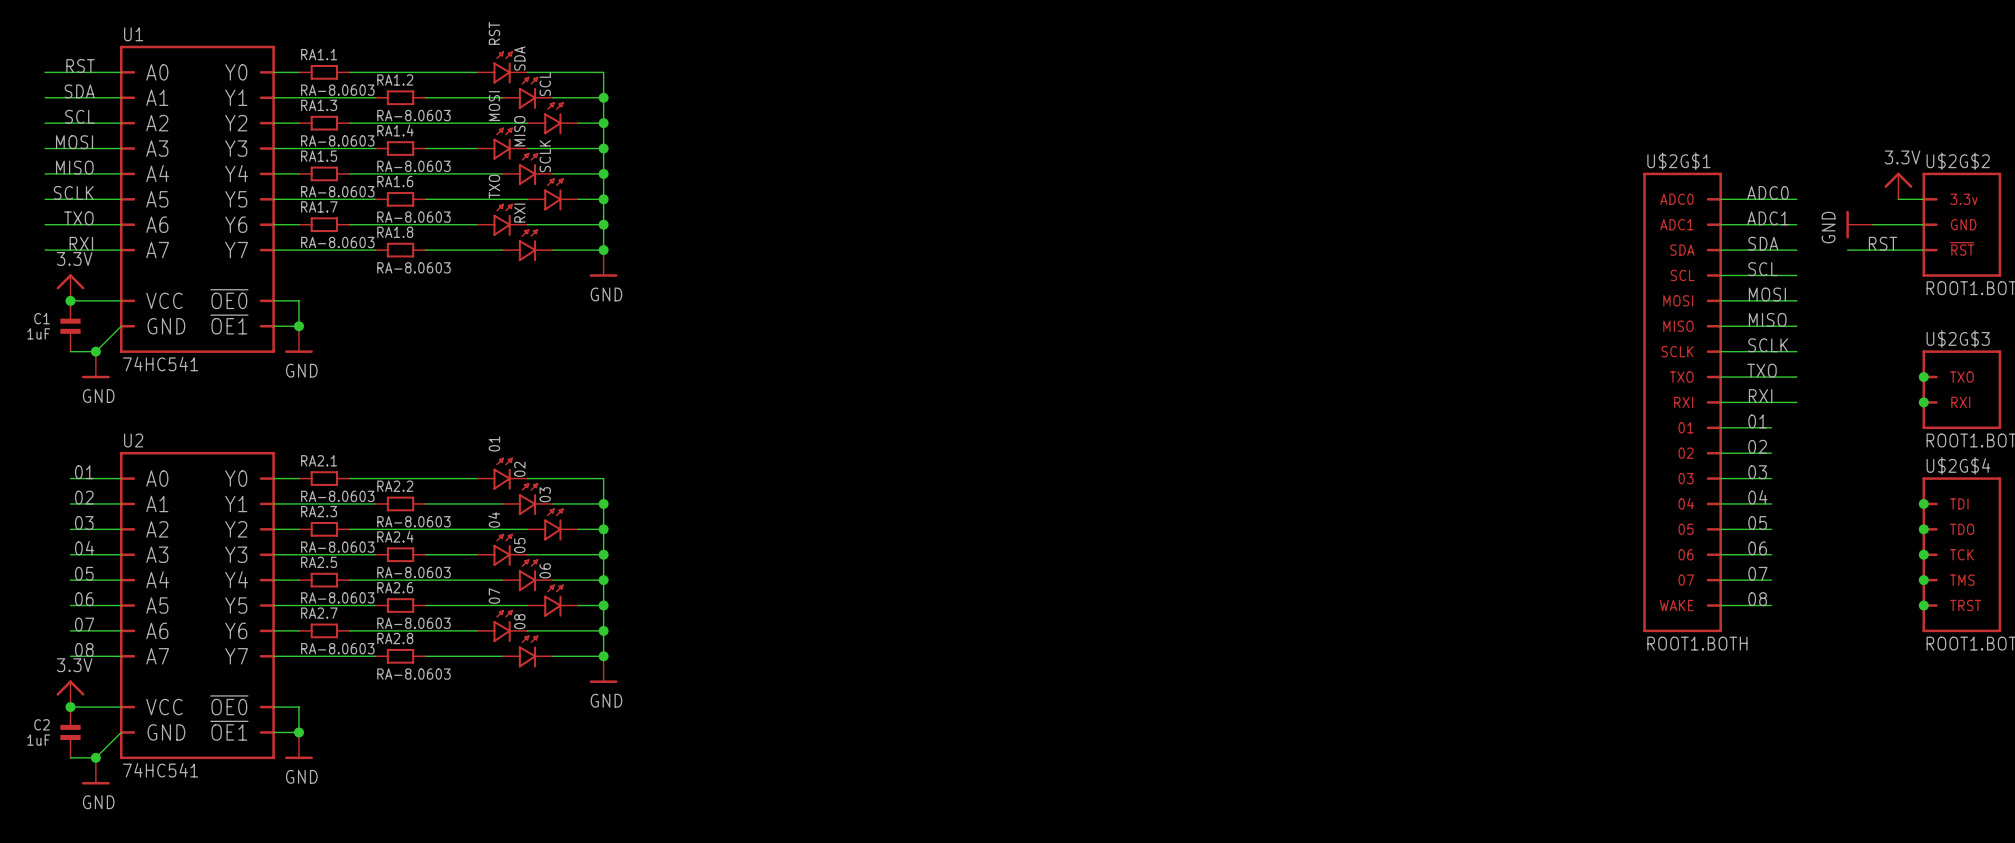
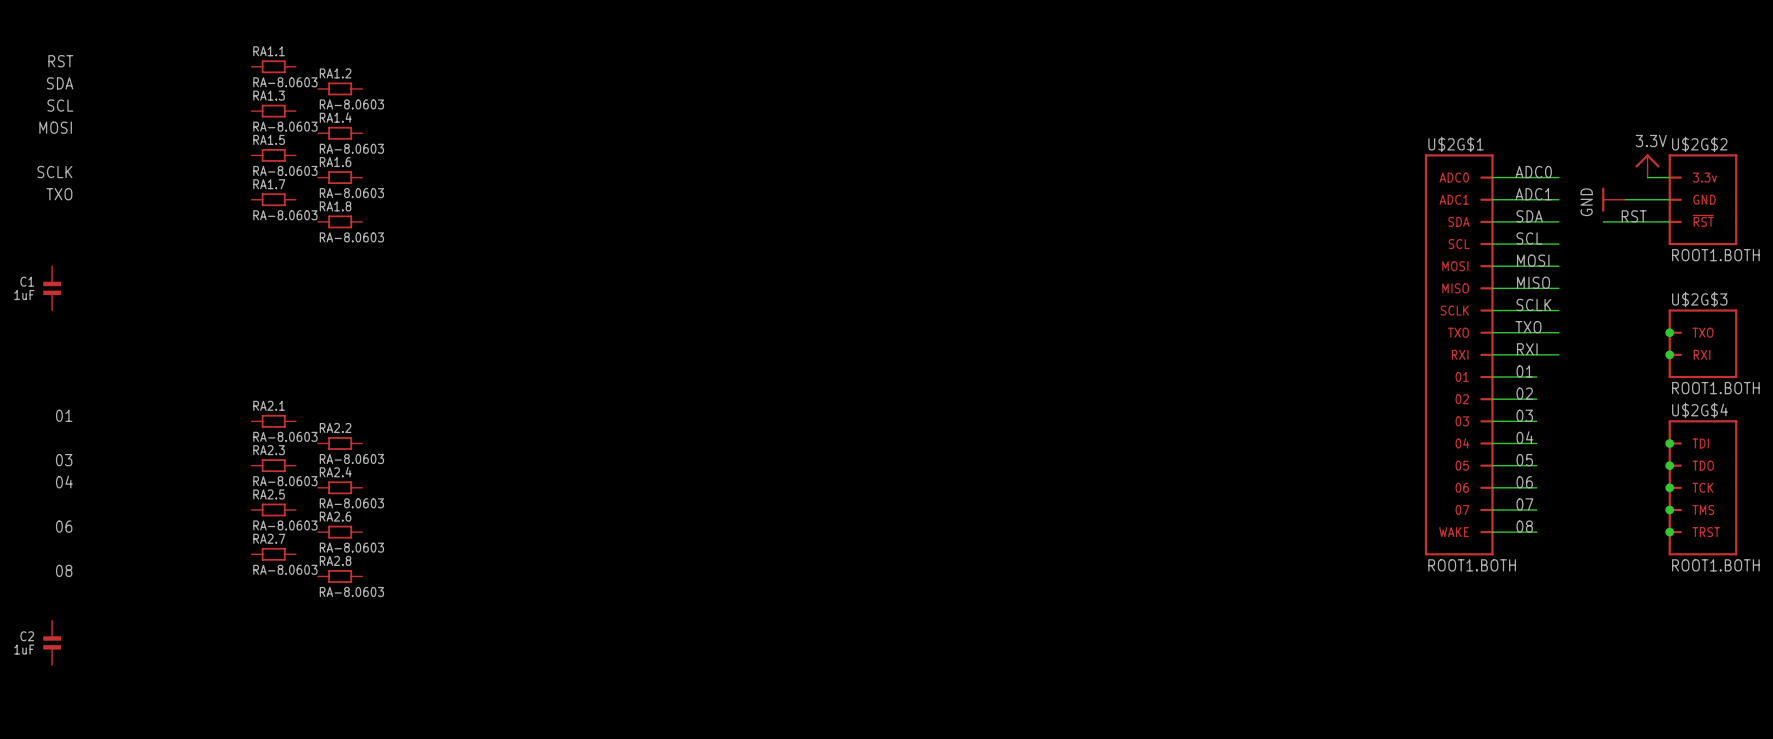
RST: (502, 67) -> none
wire: (45, 72) (121, 72) -> none
wire: (273, 72) (298, 72) -> none
wire: (349, 72) (476, 72) -> none
wire: (527, 72) (603, 72) (603, 250) (552, 250) -> none
SDA: (527, 92) -> none
wire: (45, 97) (121, 97) -> none
wire: (273, 97) (375, 97) -> none
wire: (425, 97) (502, 97) -> none
wire: (552, 97) (603, 97) -> none
junction: (603, 97) -> none
SCL: (552, 118) -> none
wire: (45, 123) (121, 123) -> none
wire: (273, 123) (298, 123) -> none
wire: (349, 123) (527, 123) -> none
wire: (578, 123) (603, 123) -> none
junction: (603, 123) -> none
MOSI: (502, 143) -> none
wire: (45, 148) (121, 148) -> none
wire: (273, 148) (375, 148) -> none
wire: (425, 148) (476, 148) -> none
wire: (527, 148) (603, 148) -> none
junction: (603, 148) -> none
label: MISO (74, 167) -> none
MISO: (527, 168) -> none
wire: (45, 173) (121, 173) -> none
wire: (273, 173) (298, 173) -> none
wire: (349, 173) (502, 173) -> none
wire: (552, 173) (603, 173) -> none
junction: (603, 173) -> none
SCLK: (552, 194) -> none
wire: (45, 199) (121, 199) -> none
U1: 74HC541 (197, 199) -> none
wire: (273, 199) (375, 199) -> none
wire: (425, 199) (527, 199) -> none
wire: (578, 199) (603, 199) -> none
junction: (603, 199) -> none
TXO: (502, 219) -> none
wire: (45, 224) (121, 224) -> none
wire: (273, 224) (298, 224) -> none
wire: (349, 224) (476, 224) -> none
wire: (527, 224) (603, 224) -> none
junction: (603, 224) -> none
label: RXI (81, 243) -> none
RXI: (527, 245) -> none
wire: (45, 250) (121, 250) -> none
wire: (273, 250) (375, 250) -> none
wire: (425, 250) (502, 250) -> none
junction: (603, 250) -> none
power symbol: GND (603, 263) -> none
power symbol: 3.3V (70, 287) -> none
wire: (70, 300) (121, 300) -> none
junction: (70, 300) -> none
wire: (273, 300) (298, 300) (298, 326) (273, 326) -> none
wire: (121, 326) (95, 351) (70, 351) -> none
junction: (298, 326) -> none
power symbol: GND (298, 339) -> none
junction: (95, 351) -> none
power symbol: GND (95, 364) -> none
01: (502, 473) -> none
wire: (70, 478) (121, 478) -> none
wire: (273, 478) (298, 478) -> none
wire: (349, 478) (476, 478) -> none
wire: (527, 478) (603, 478) (603, 656) (552, 656) -> none
label: 02 (84, 497) -> none
02: (527, 499) -> none
wire: (70, 503) (121, 503) -> none
wire: (273, 503) (375, 503) -> none
wire: (425, 503) (502, 503) -> none
wire: (552, 503) (603, 503) -> none
junction: (603, 503) -> none
03: (552, 524) -> none
wire: (70, 529) (121, 529) -> none
wire: (273, 529) (298, 529) -> none
wire: (349, 529) (527, 529) -> none
wire: (578, 529) (603, 529) -> none
junction: (603, 529) -> none
04: (502, 549) -> none
wire: (70, 554) (121, 554) -> none
wire: (273, 554) (375, 554) -> none
wire: (425, 554) (476, 554) -> none
wire: (527, 554) (603, 554) -> none
junction: (603, 554) -> none
label: 05 (84, 573) -> none
05: (527, 575) -> none
wire: (70, 580) (121, 580) -> none
wire: (273, 580) (298, 580) -> none
wire: (349, 580) (502, 580) -> none
wire: (552, 580) (603, 580) -> none
junction: (603, 580) -> none
06: (552, 600) -> none
wire: (70, 605) (121, 605) -> none
U2: 74HC541 (197, 605) -> none
wire: (273, 605) (375, 605) -> none
wire: (425, 605) (527, 605) -> none
wire: (578, 605) (603, 605) -> none
junction: (603, 605) -> none
label: 07 (84, 624) -> none
07: (502, 625) -> none
wire: (70, 630) (121, 630) -> none
wire: (273, 630) (298, 630) -> none
wire: (349, 630) (476, 630) -> none
wire: (527, 630) (603, 630) -> none
junction: (603, 630) -> none
08: (527, 651) -> none
wire: (70, 656) (121, 656) -> none
wire: (273, 656) (375, 656) -> none
wire: (425, 656) (502, 656) -> none
junction: (603, 656) -> none
power symbol: GND (603, 669) -> none
power symbol: 3.3V (70, 693) -> none
wire: (70, 707) (121, 707) -> none
junction: (70, 707) -> none
wire: (273, 707) (298, 707) (298, 732) (273, 732) -> none
wire: (121, 732) (95, 757) (70, 757) -> none
junction: (298, 732) -> none
power symbol: GND (298, 745) -> none
junction: (95, 757) -> none
power symbol: GND (95, 771) -> none

